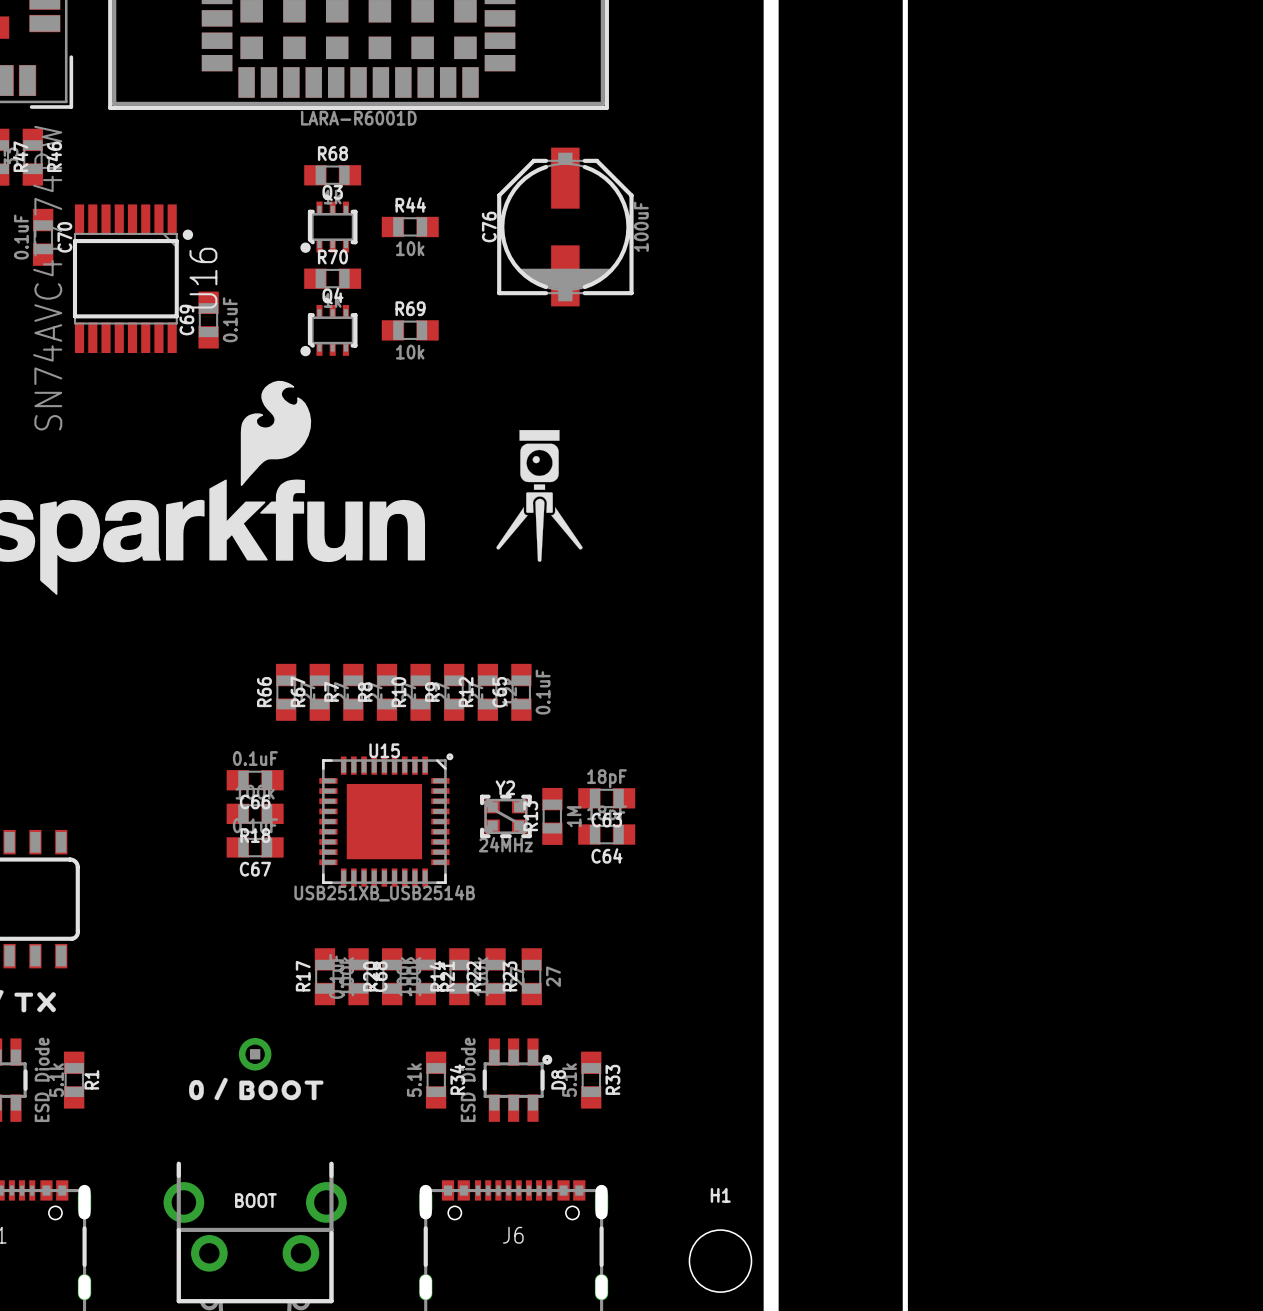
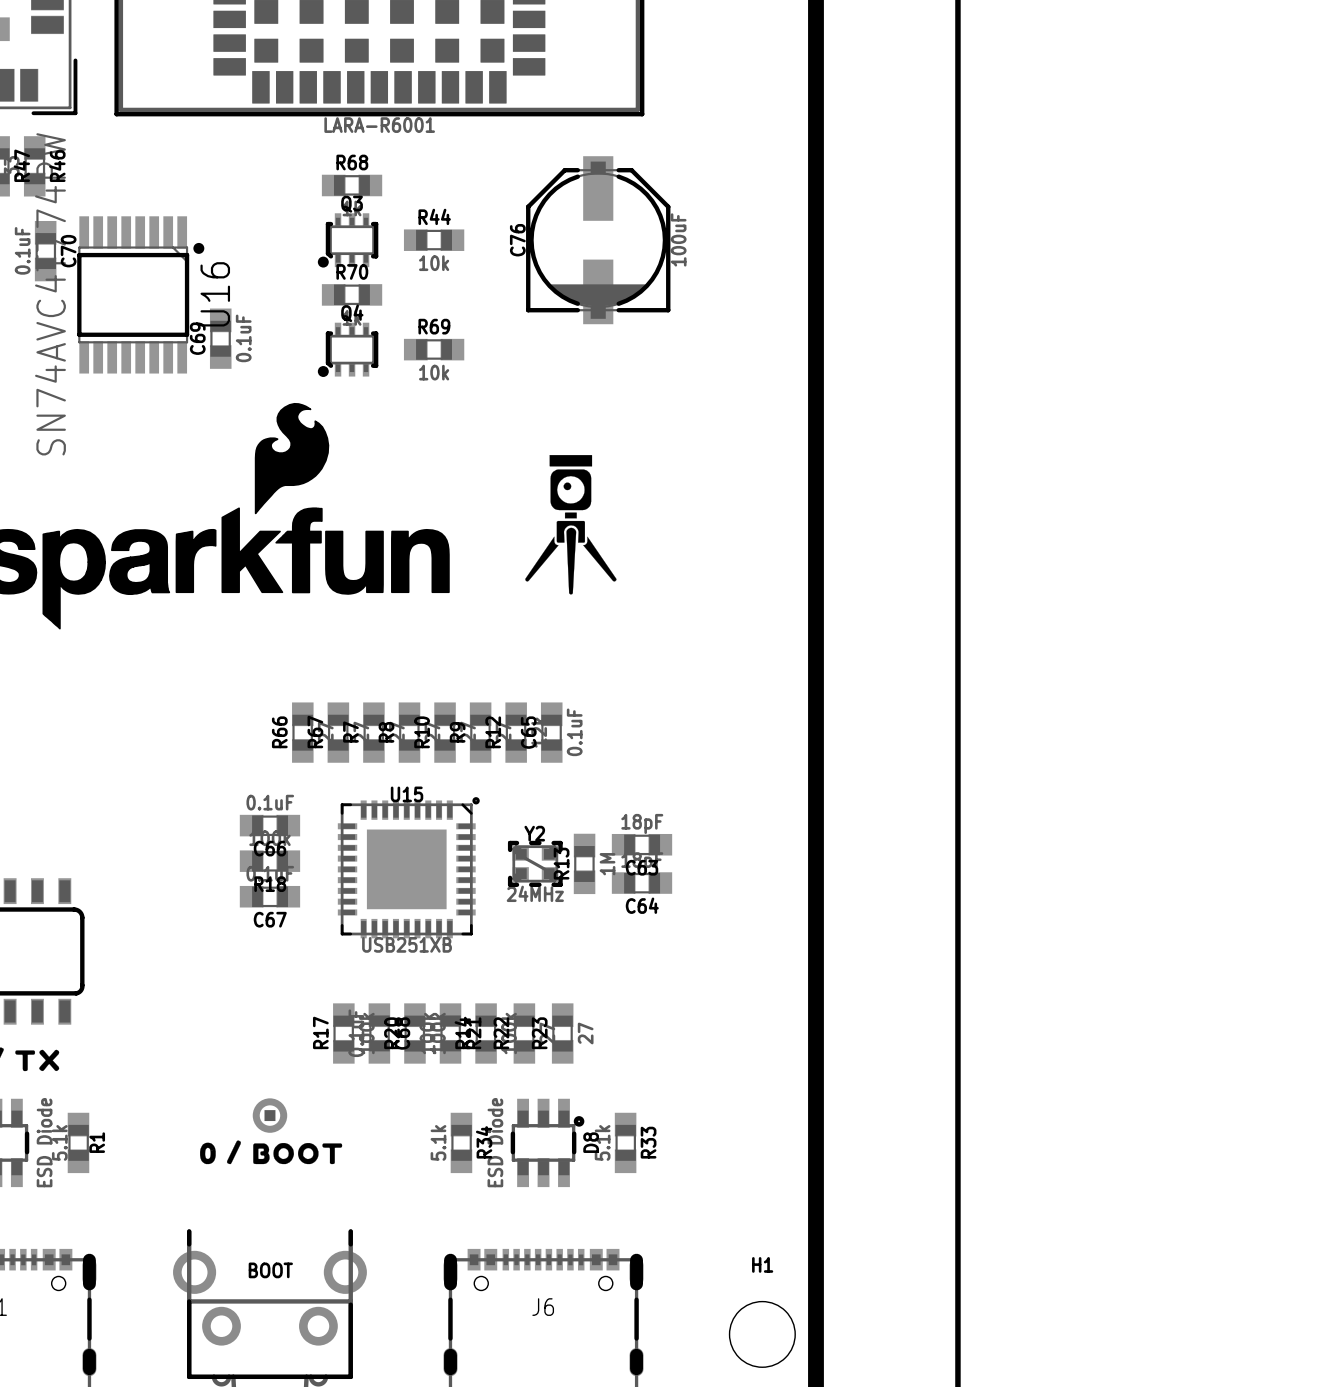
part value: LARA-R6001D (358, 118) -> LARA-R6001 (379, 125)
U15 value: USB251XB_USB2514B (384, 893) -> USB251XB (407, 944)

